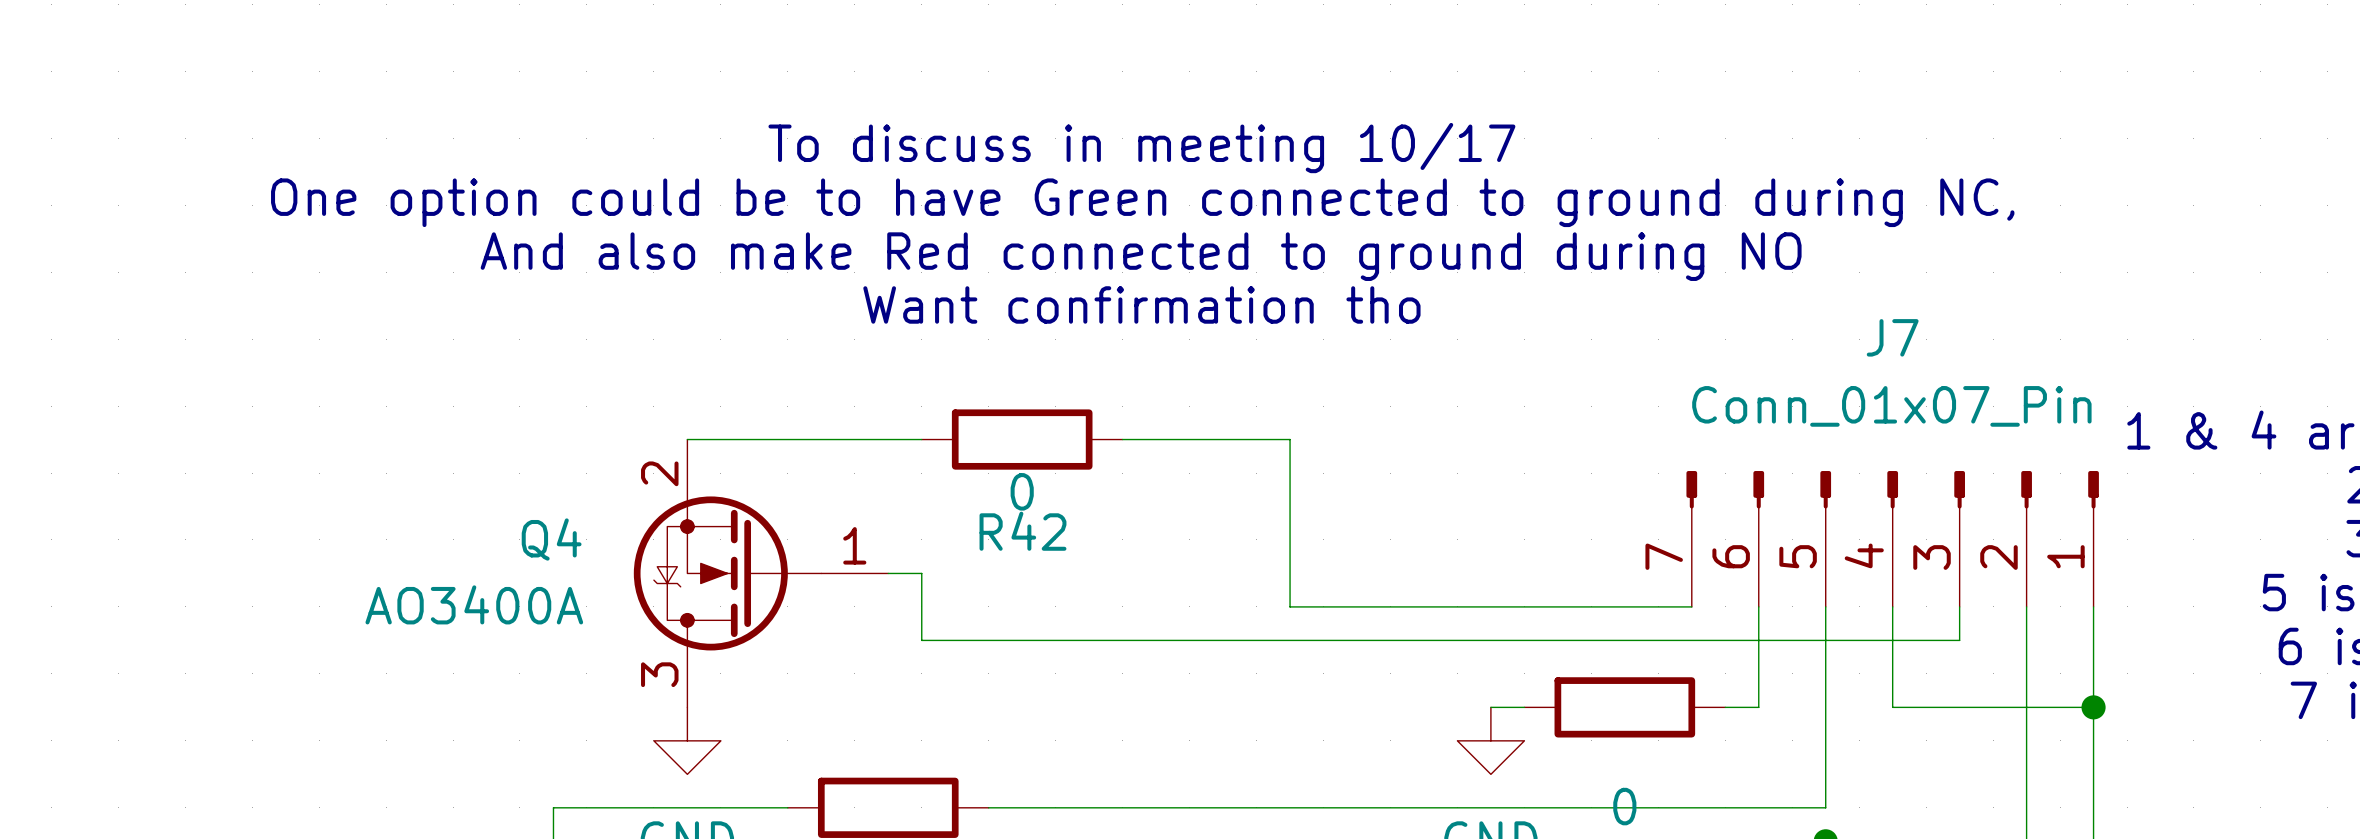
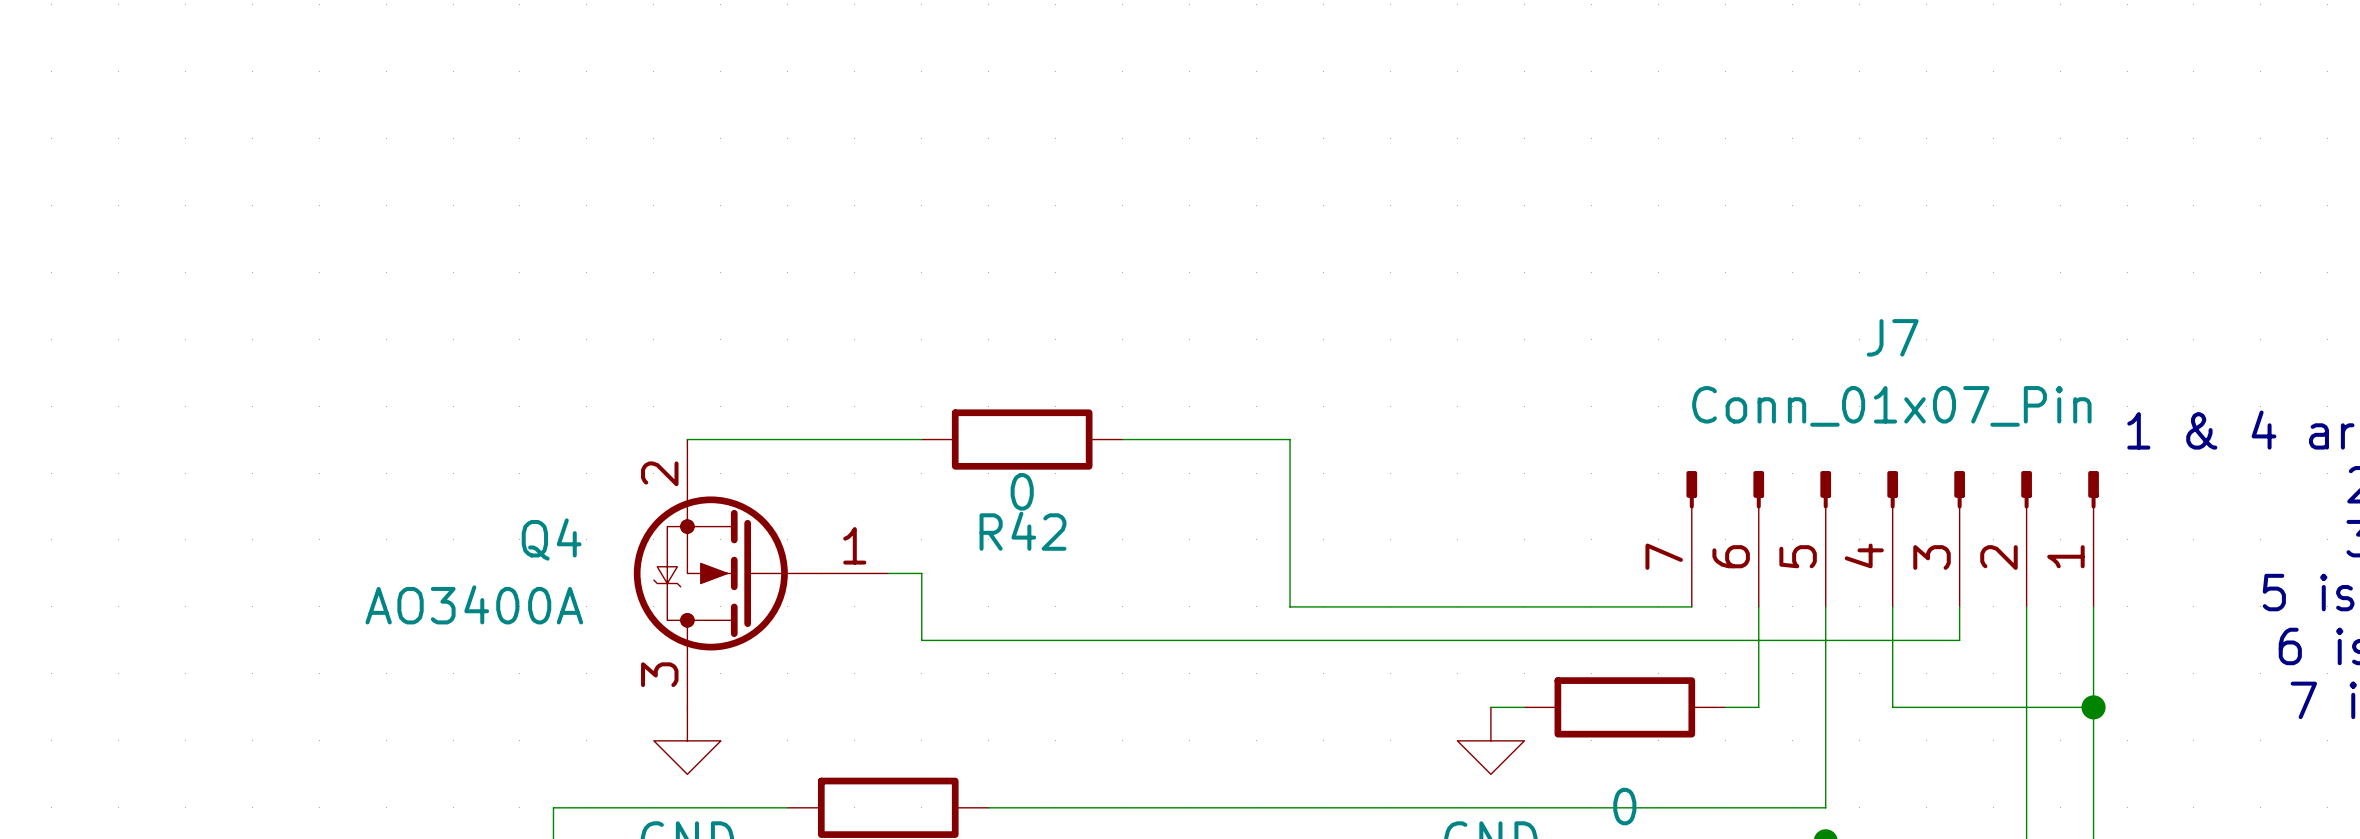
text: To discuss in meeting 10/17 (1141, 148) -> none
text: One option could be to have Green connected to ground during NC, (1142, 202) -> none
text: And also make Red connected to ground during NO (1141, 256) -> none
text: Want confirmation tho (1141, 304) -> none

